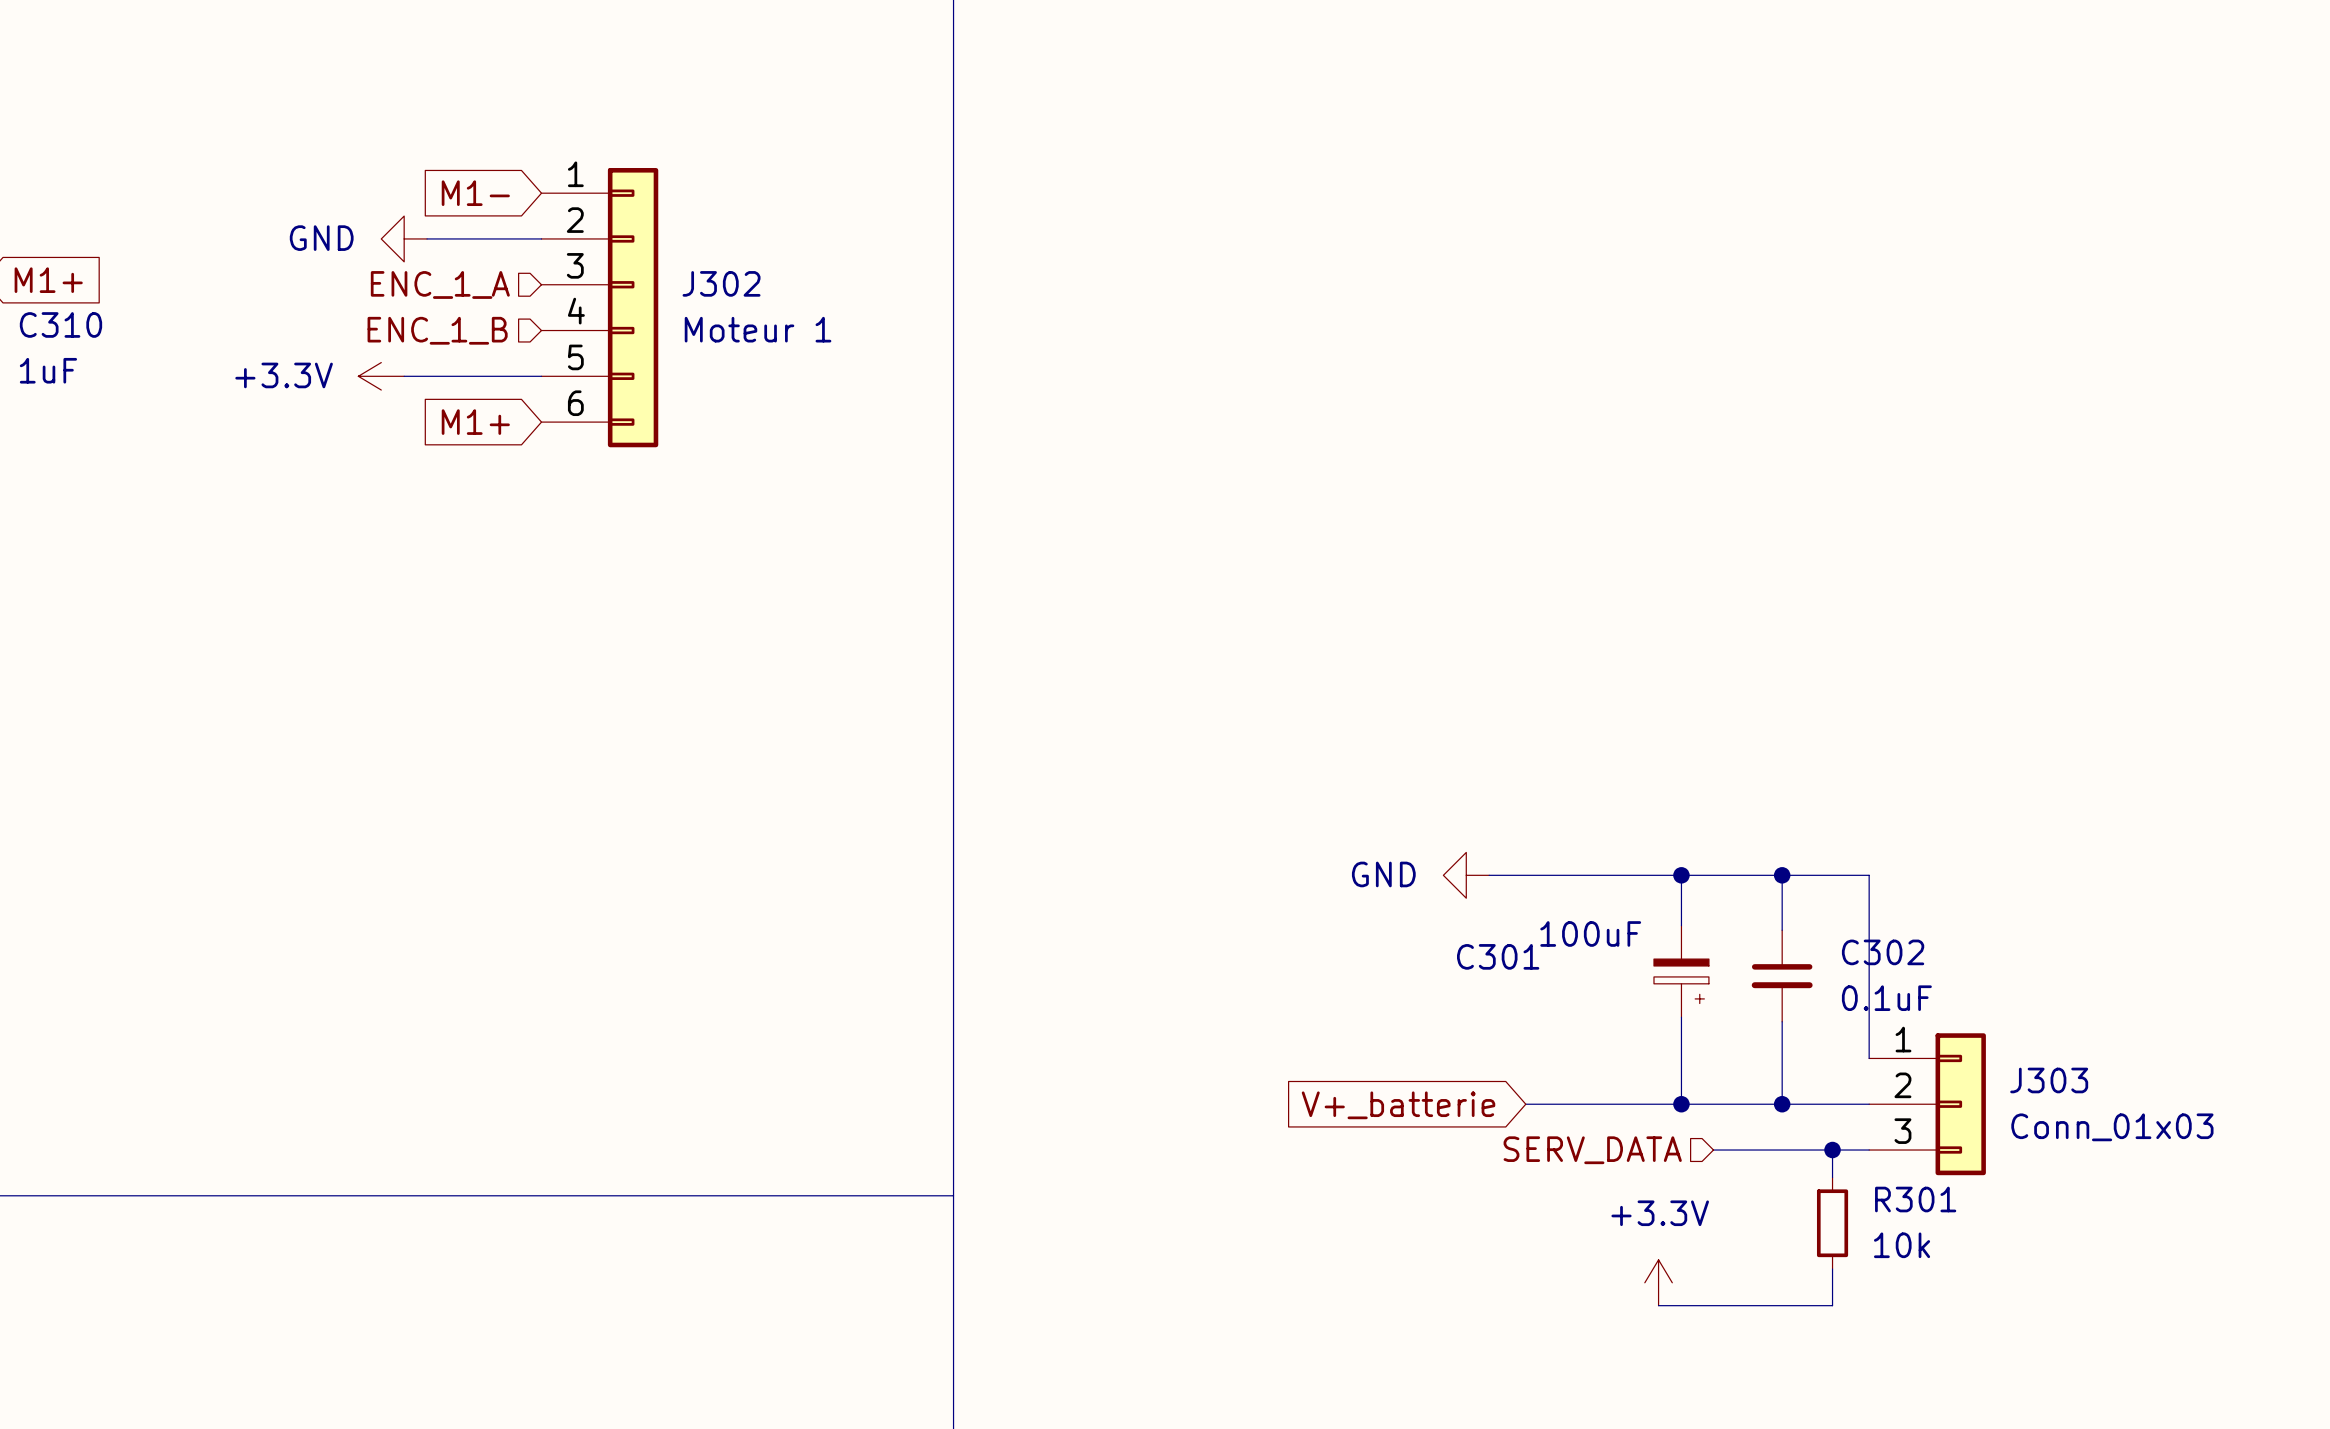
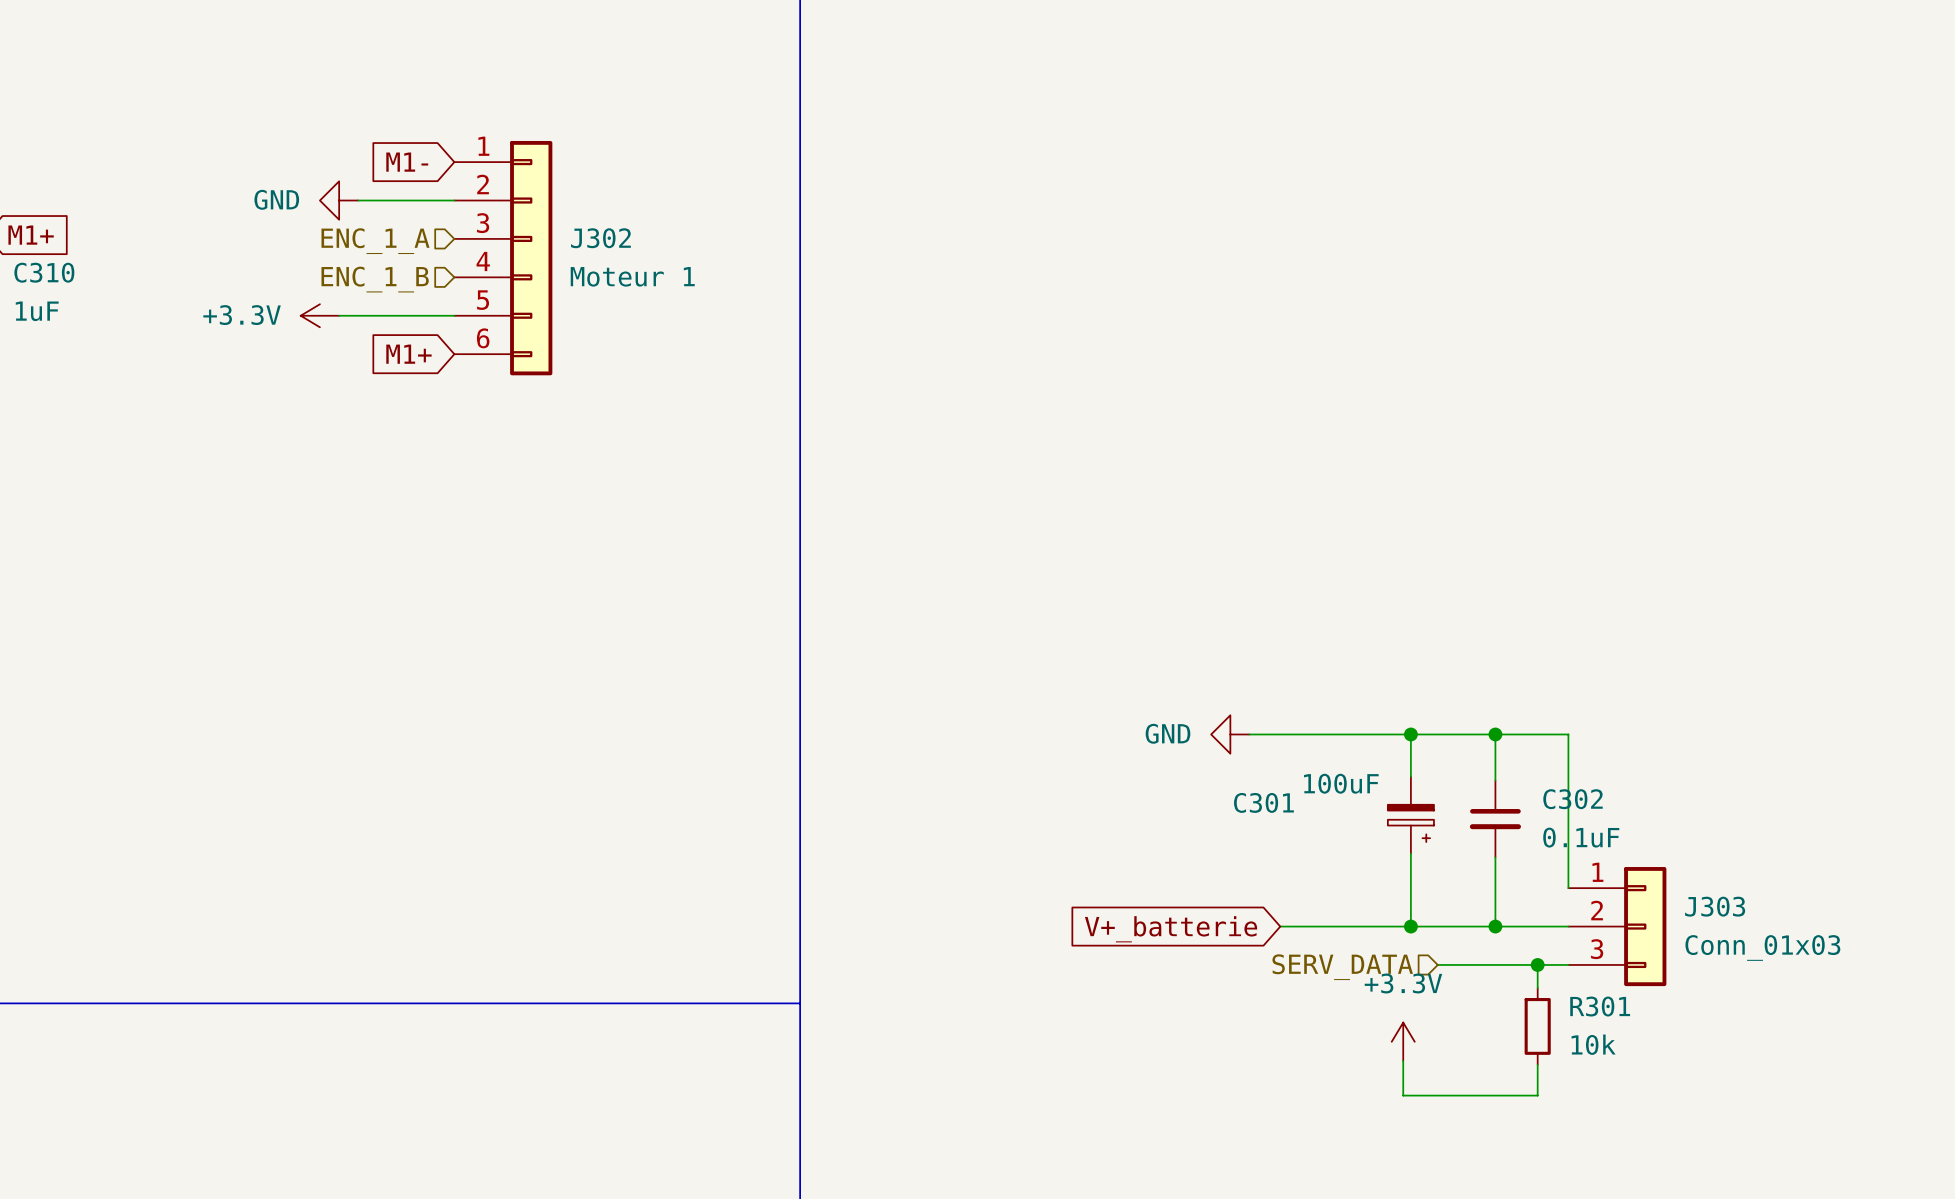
power symbol position: +3.3V (1658, 1282) -> +3.3V (1403, 1041)
wire: (1658, 1305) (1672, 1305) -> (1403, 1061) (1403, 1095)

